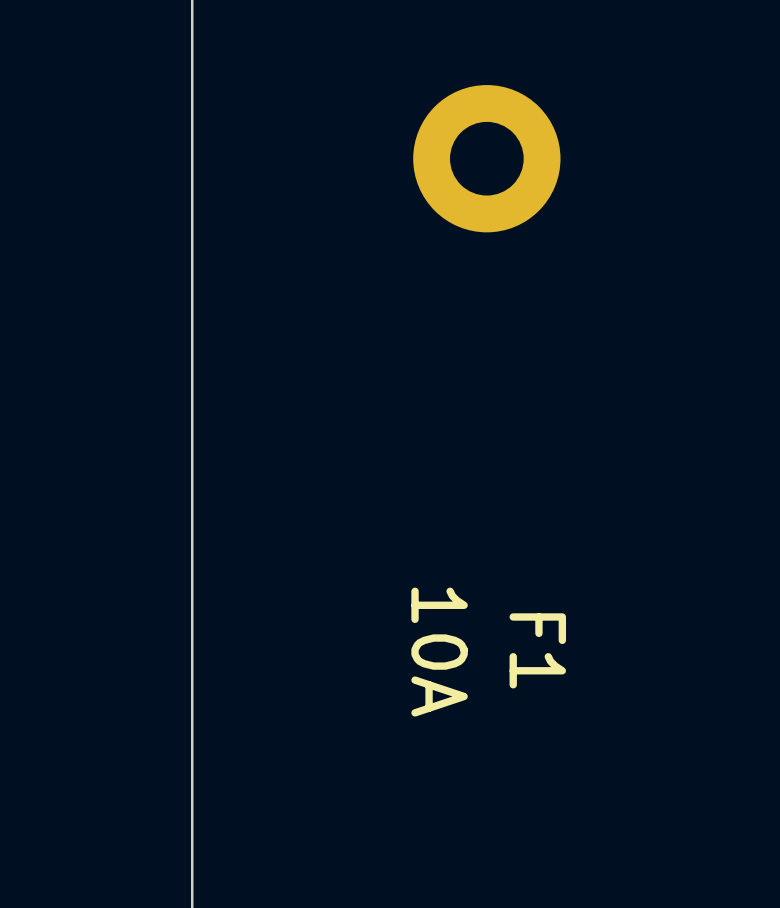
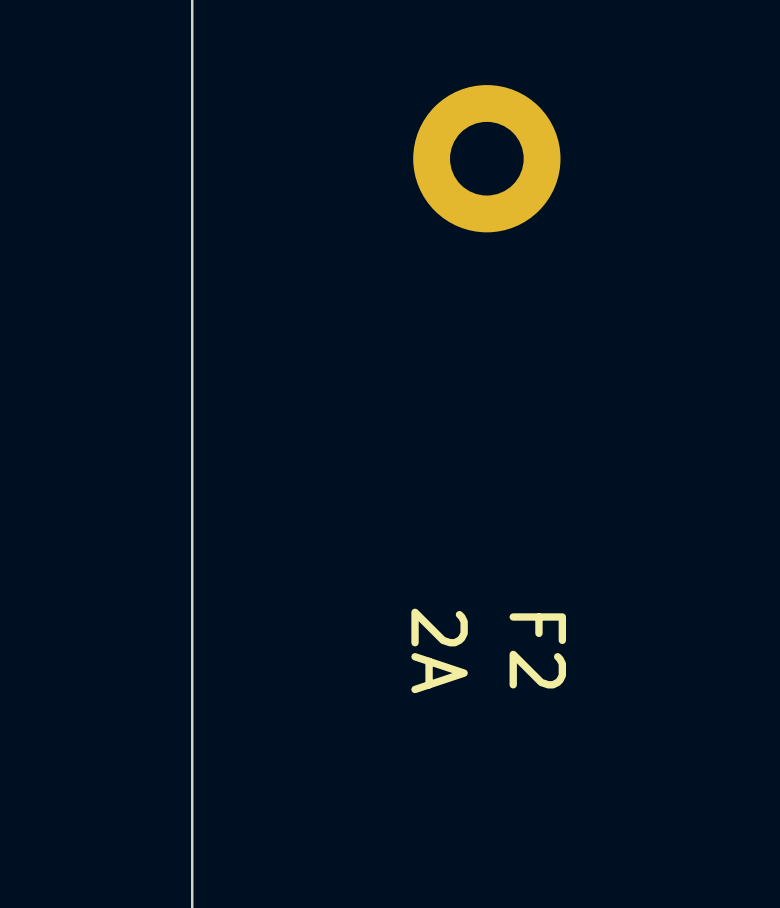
F1 name: F1 (537, 650) -> F2 (537, 650)
F1 value: 10A (439, 652) -> 2A (439, 650)

